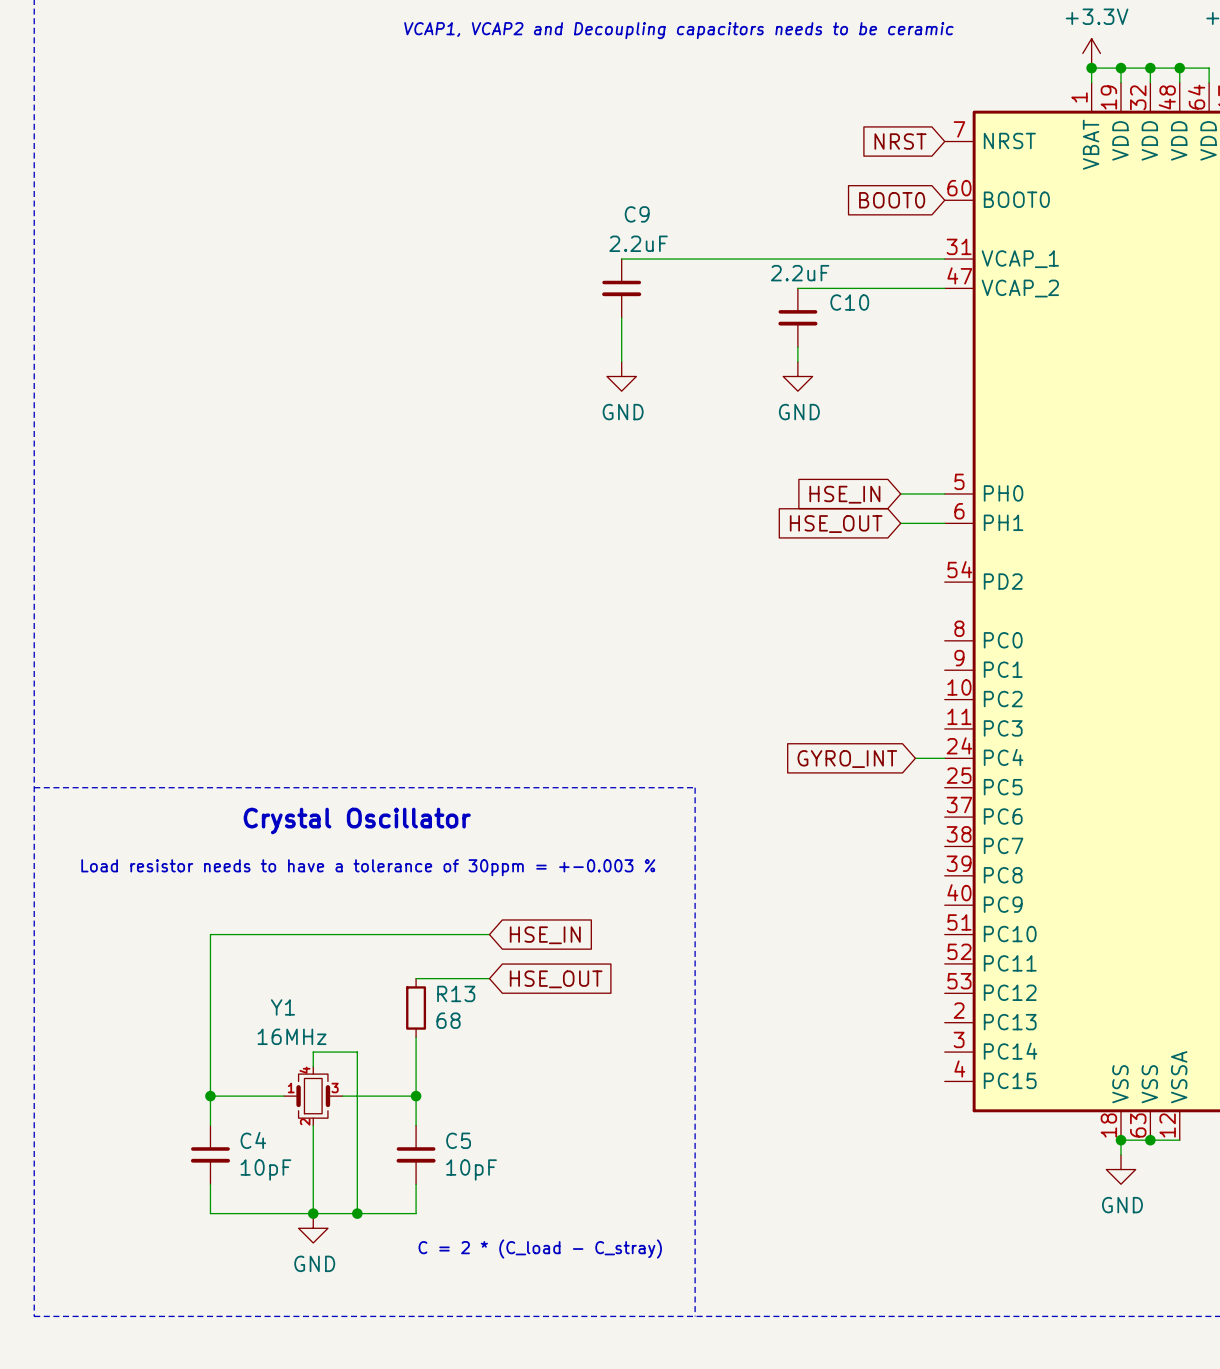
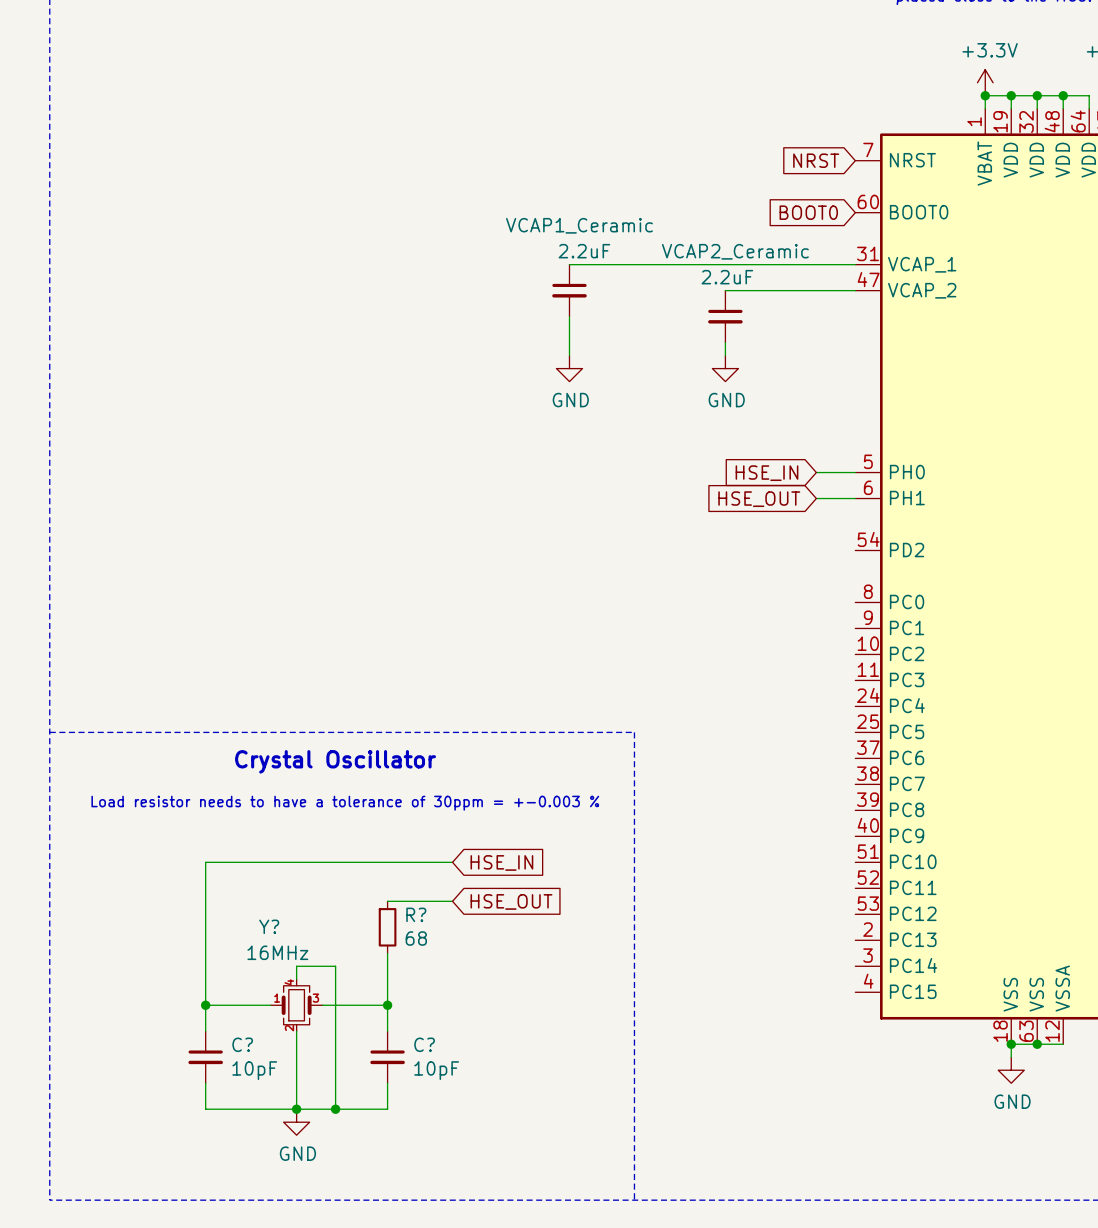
text: VCAP1, VCAP2 and Decoupling capacitors needs to be ceramic (678, 30) -> none
C9 name: C9 (637, 214) -> VCAP1_Ceramic (579, 225)
C10 name: C10 (849, 302) -> VCAP2_Ceramic (735, 251)
wire: (915, 758) (944, 758) -> none
global label: GYRO_INT (847, 759) -> none
R13 name: R13 (456, 993) -> R? (416, 914)
Y1 name: Y1 (282, 1007) -> Y? (269, 926)
C4 name: C4 (253, 1140) -> C? (242, 1044)
C5 name: C5 (458, 1140) -> C? (424, 1044)
text: C = 2 * (C_load - C_stray) (540, 1249) -> none

